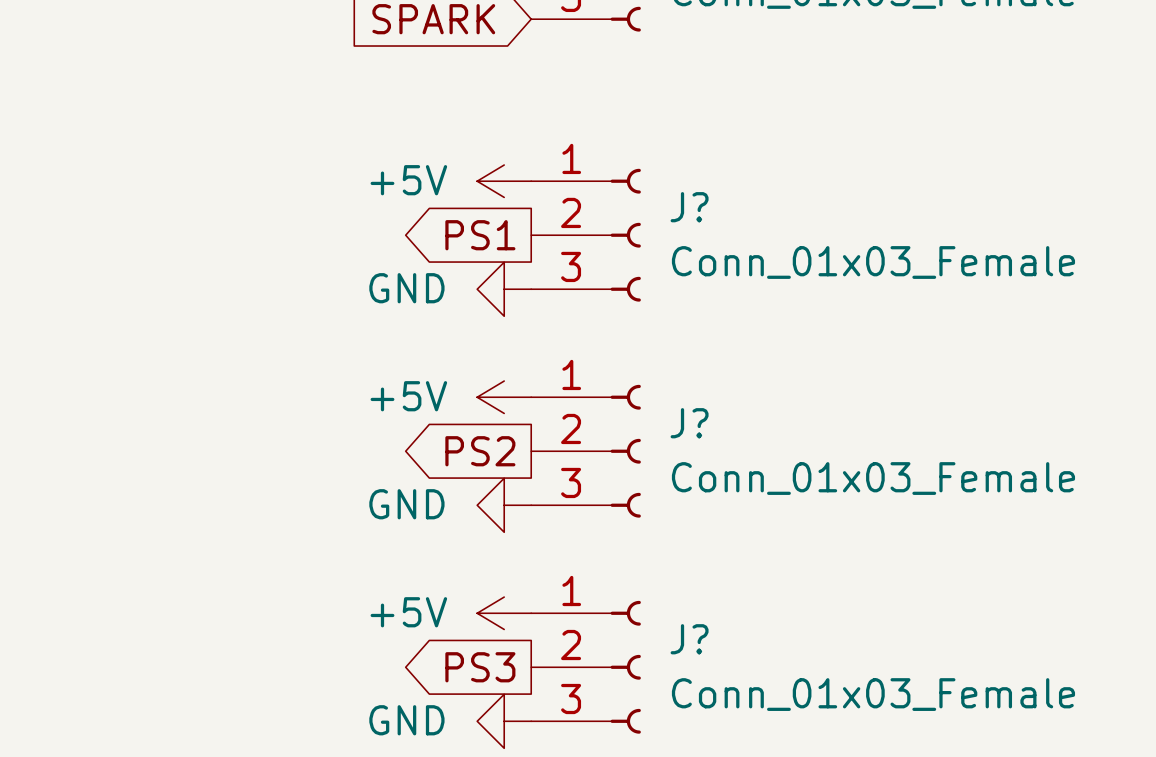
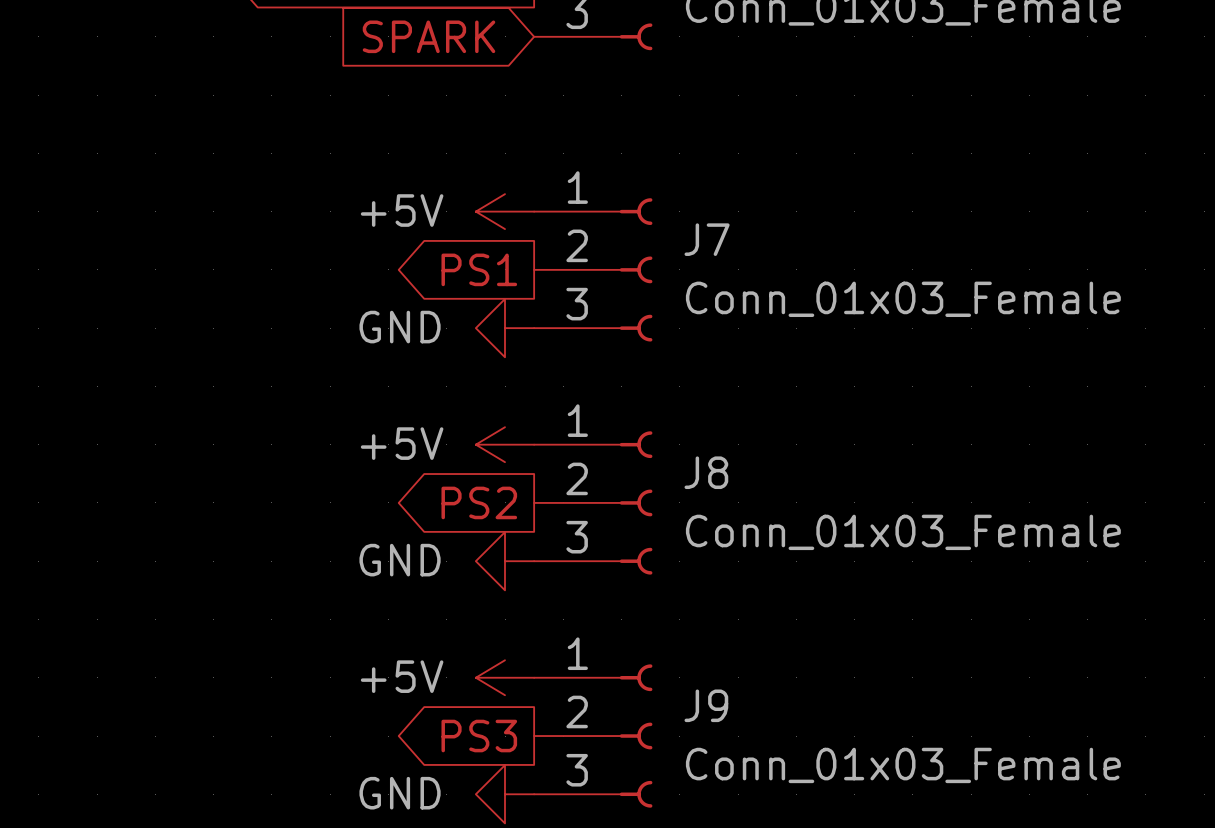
J? name: J? (689, 207) -> J7 (707, 239)
J? name: J? (689, 423) -> J8 (706, 472)
J? name: J? (689, 639) -> J9 (706, 705)

